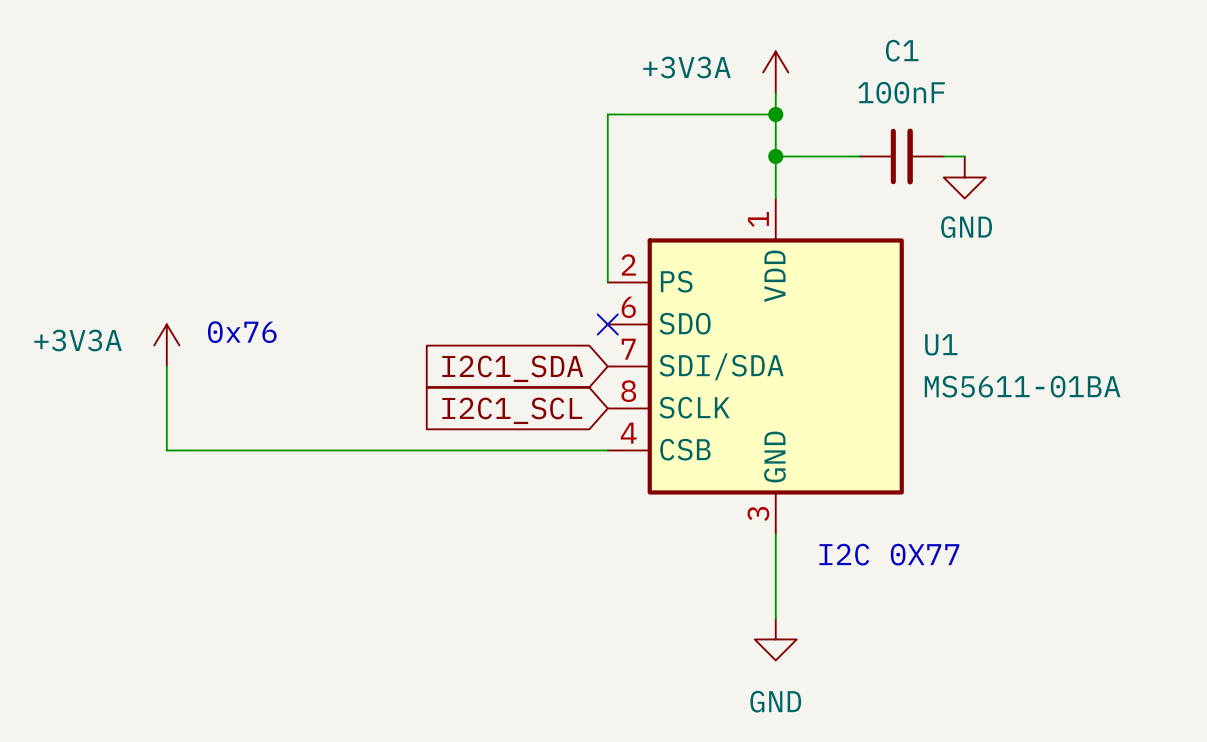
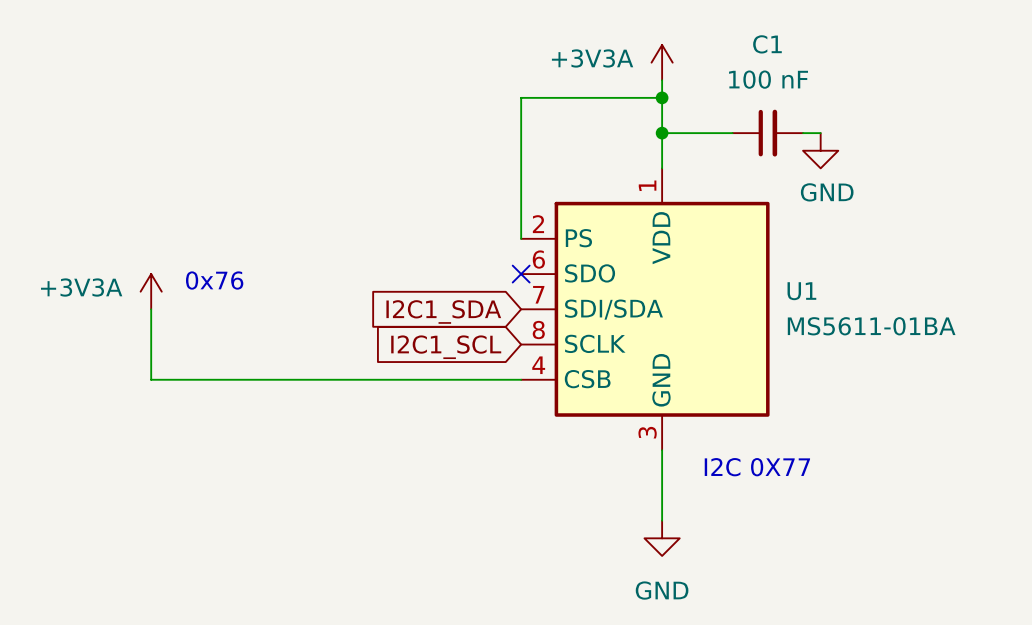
C1 value: 100nF (901, 92) -> 100 nF (768, 79)

